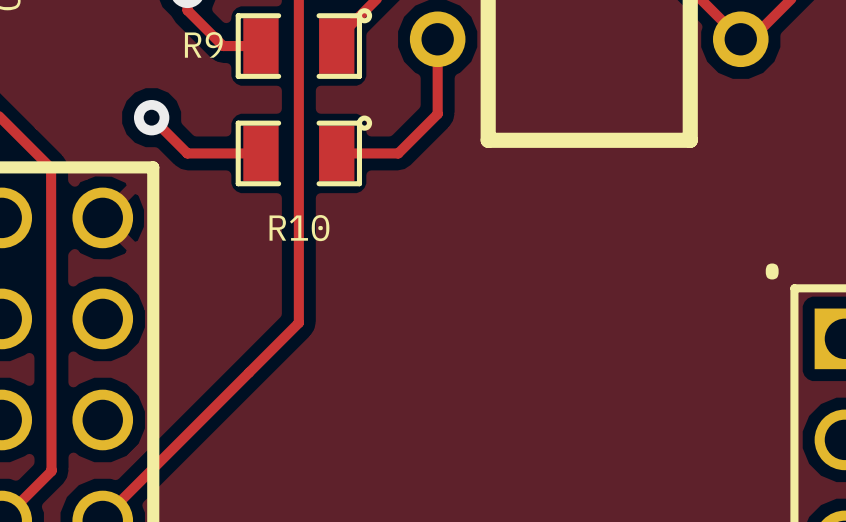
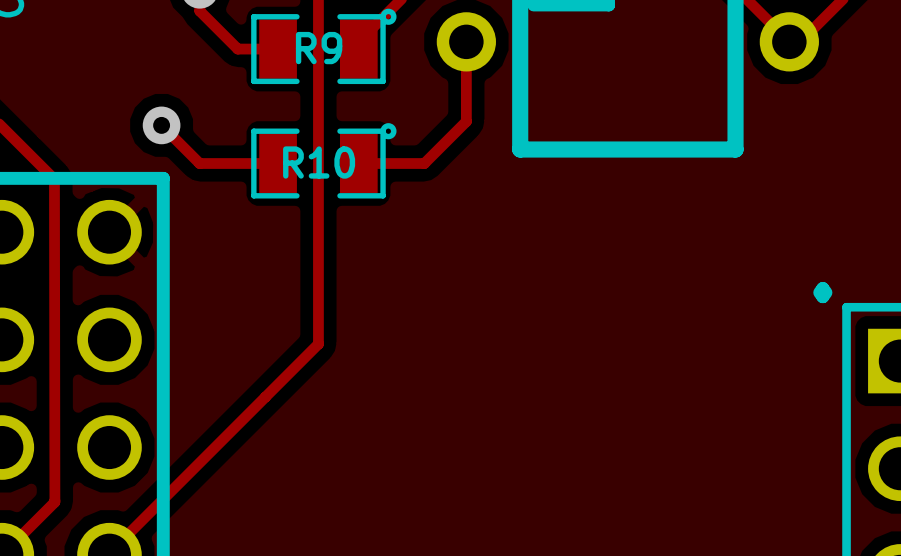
R9 name position: R9 (203, 44) -> R9 (319, 48)
R10 name position: R10 (299, 228) -> R10 (319, 162)

